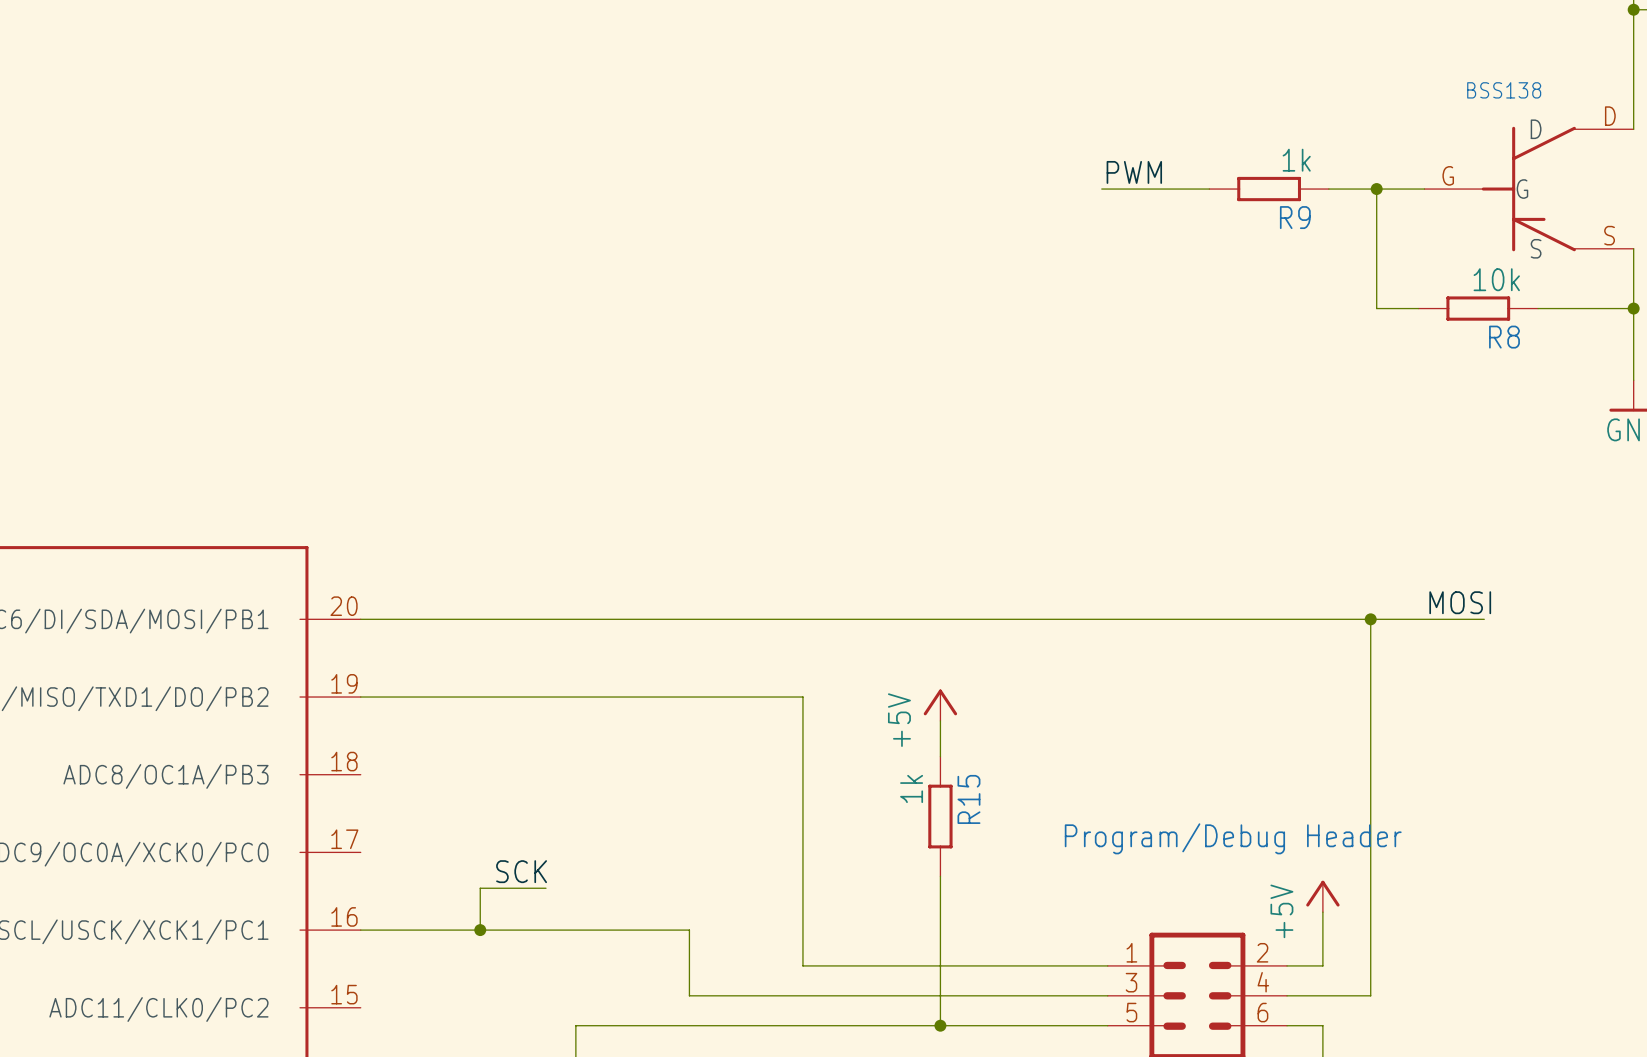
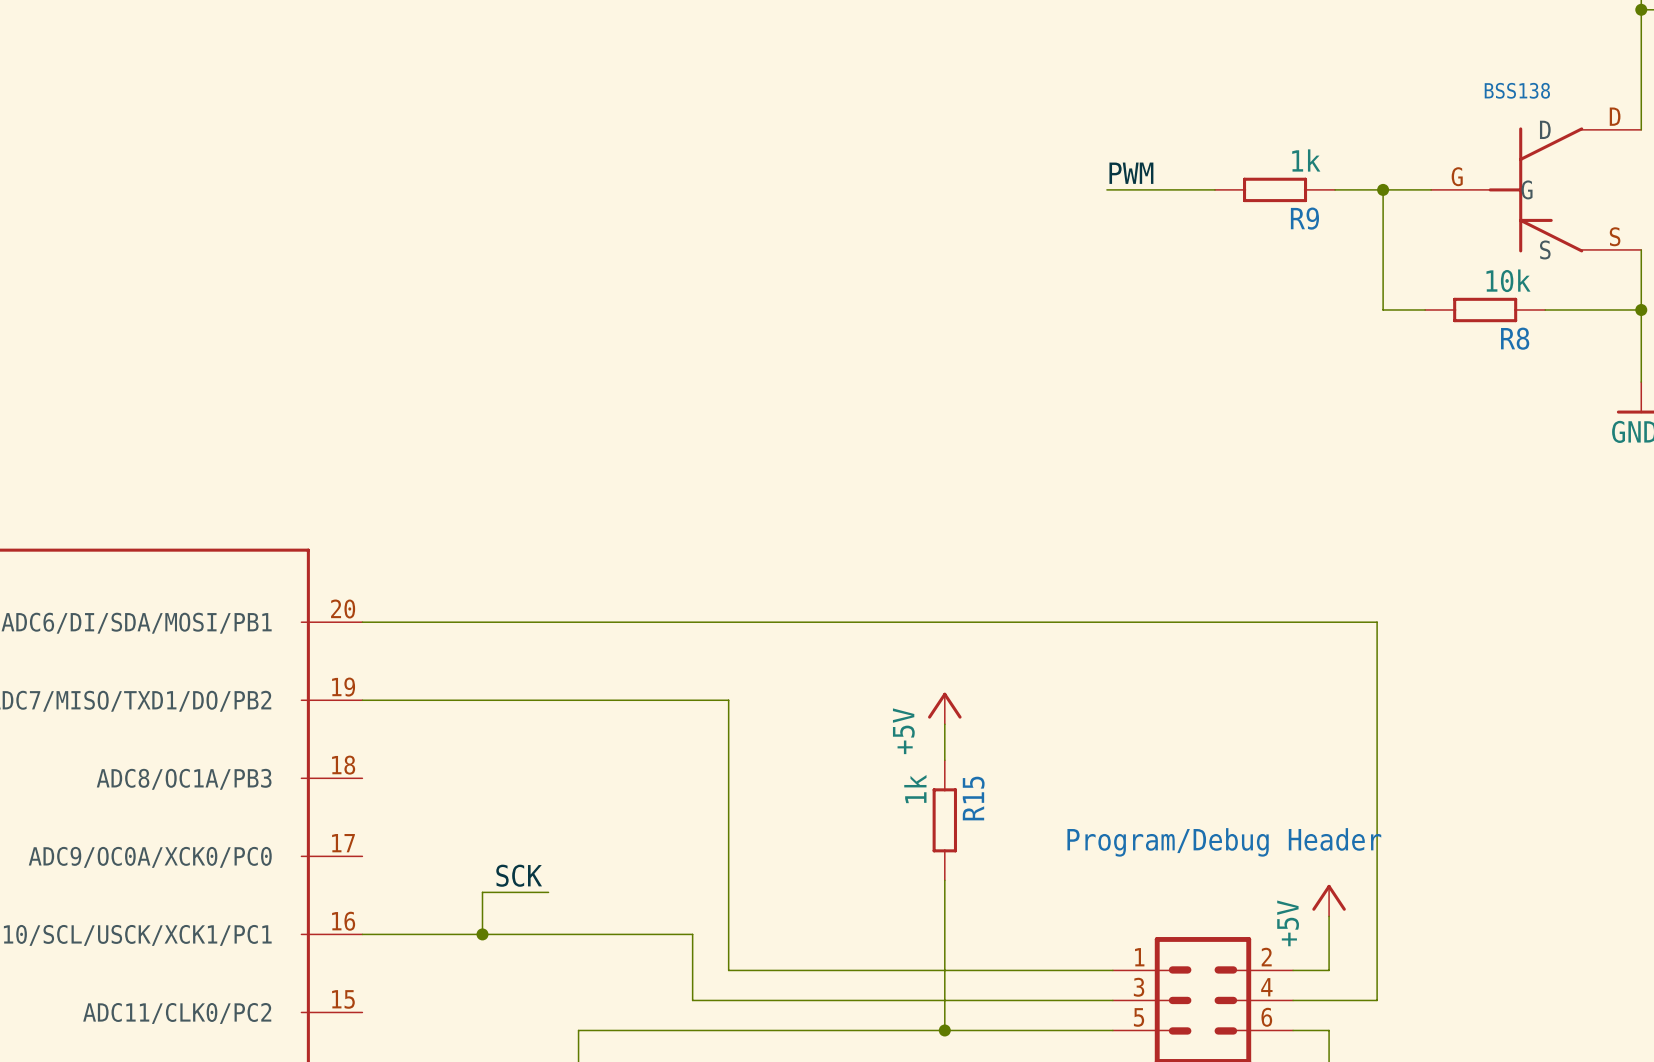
label: MOSI (1460, 602) -> none
wire: (1370, 619) (1484, 619) -> none
junction: (1370, 619) -> none
wire: (725, 697) (802, 697) (802, 965) -> (728, 700) (728, 970) (806, 970)

